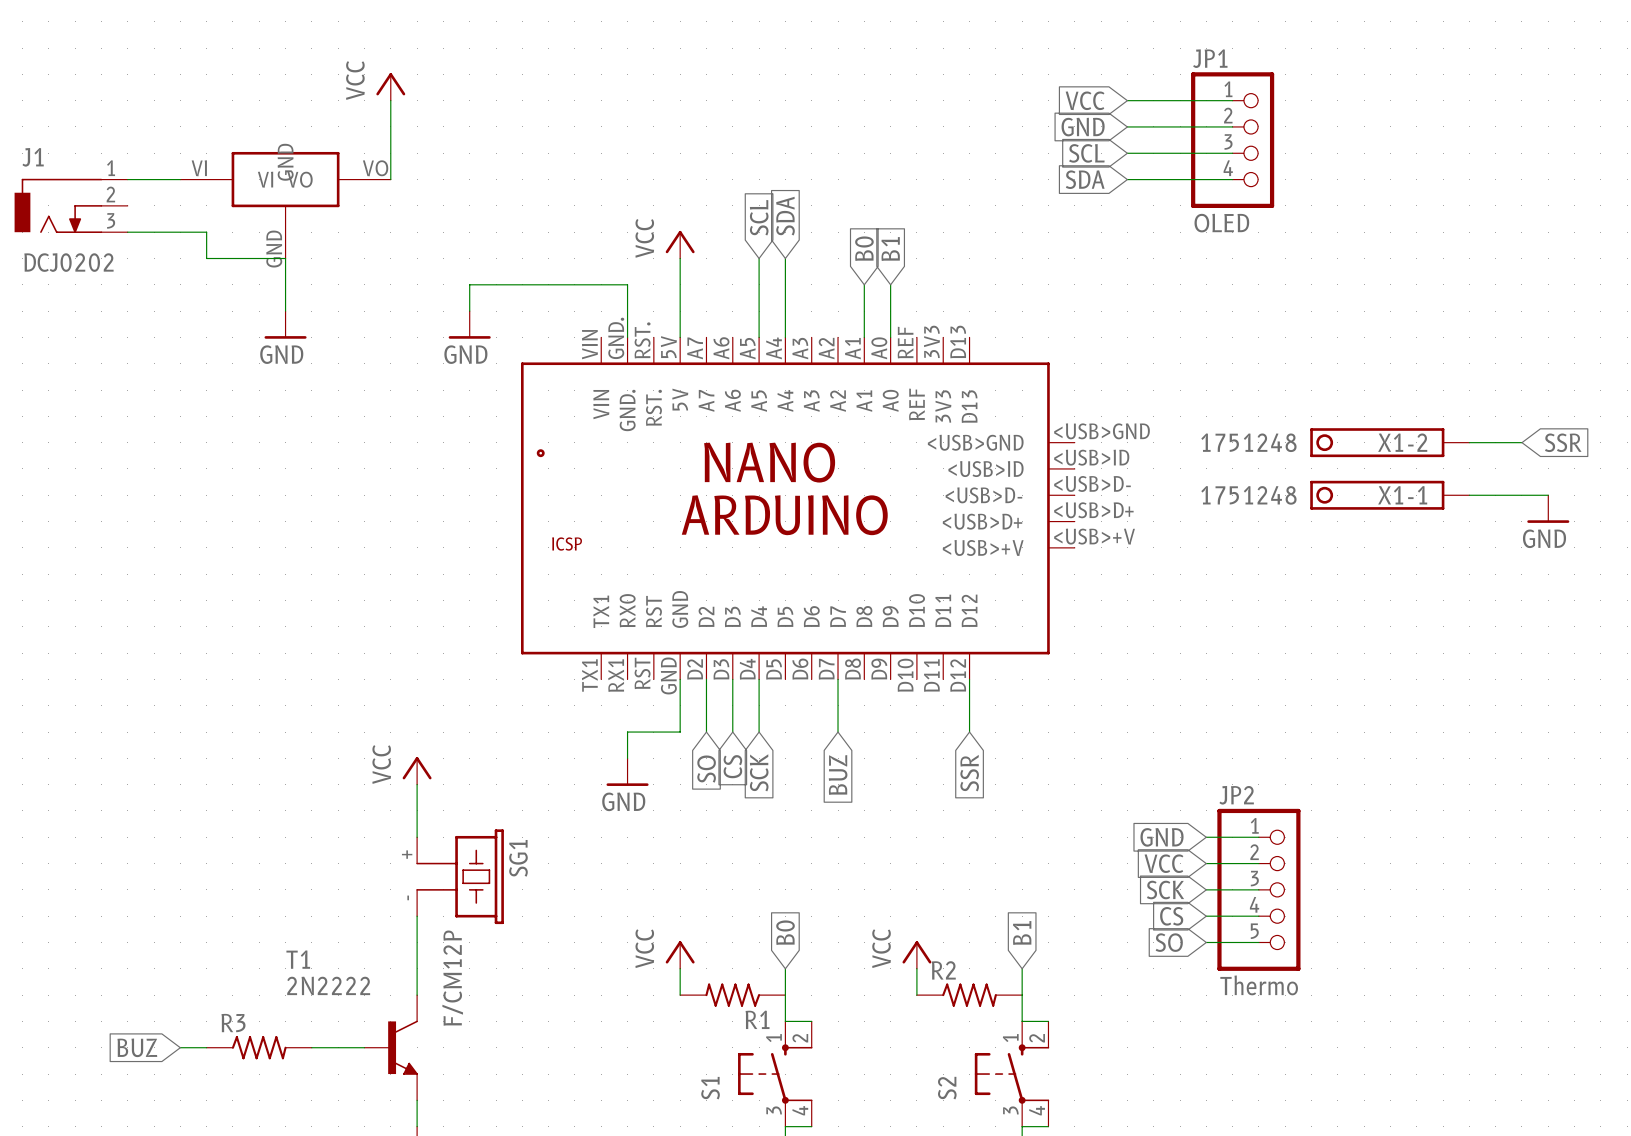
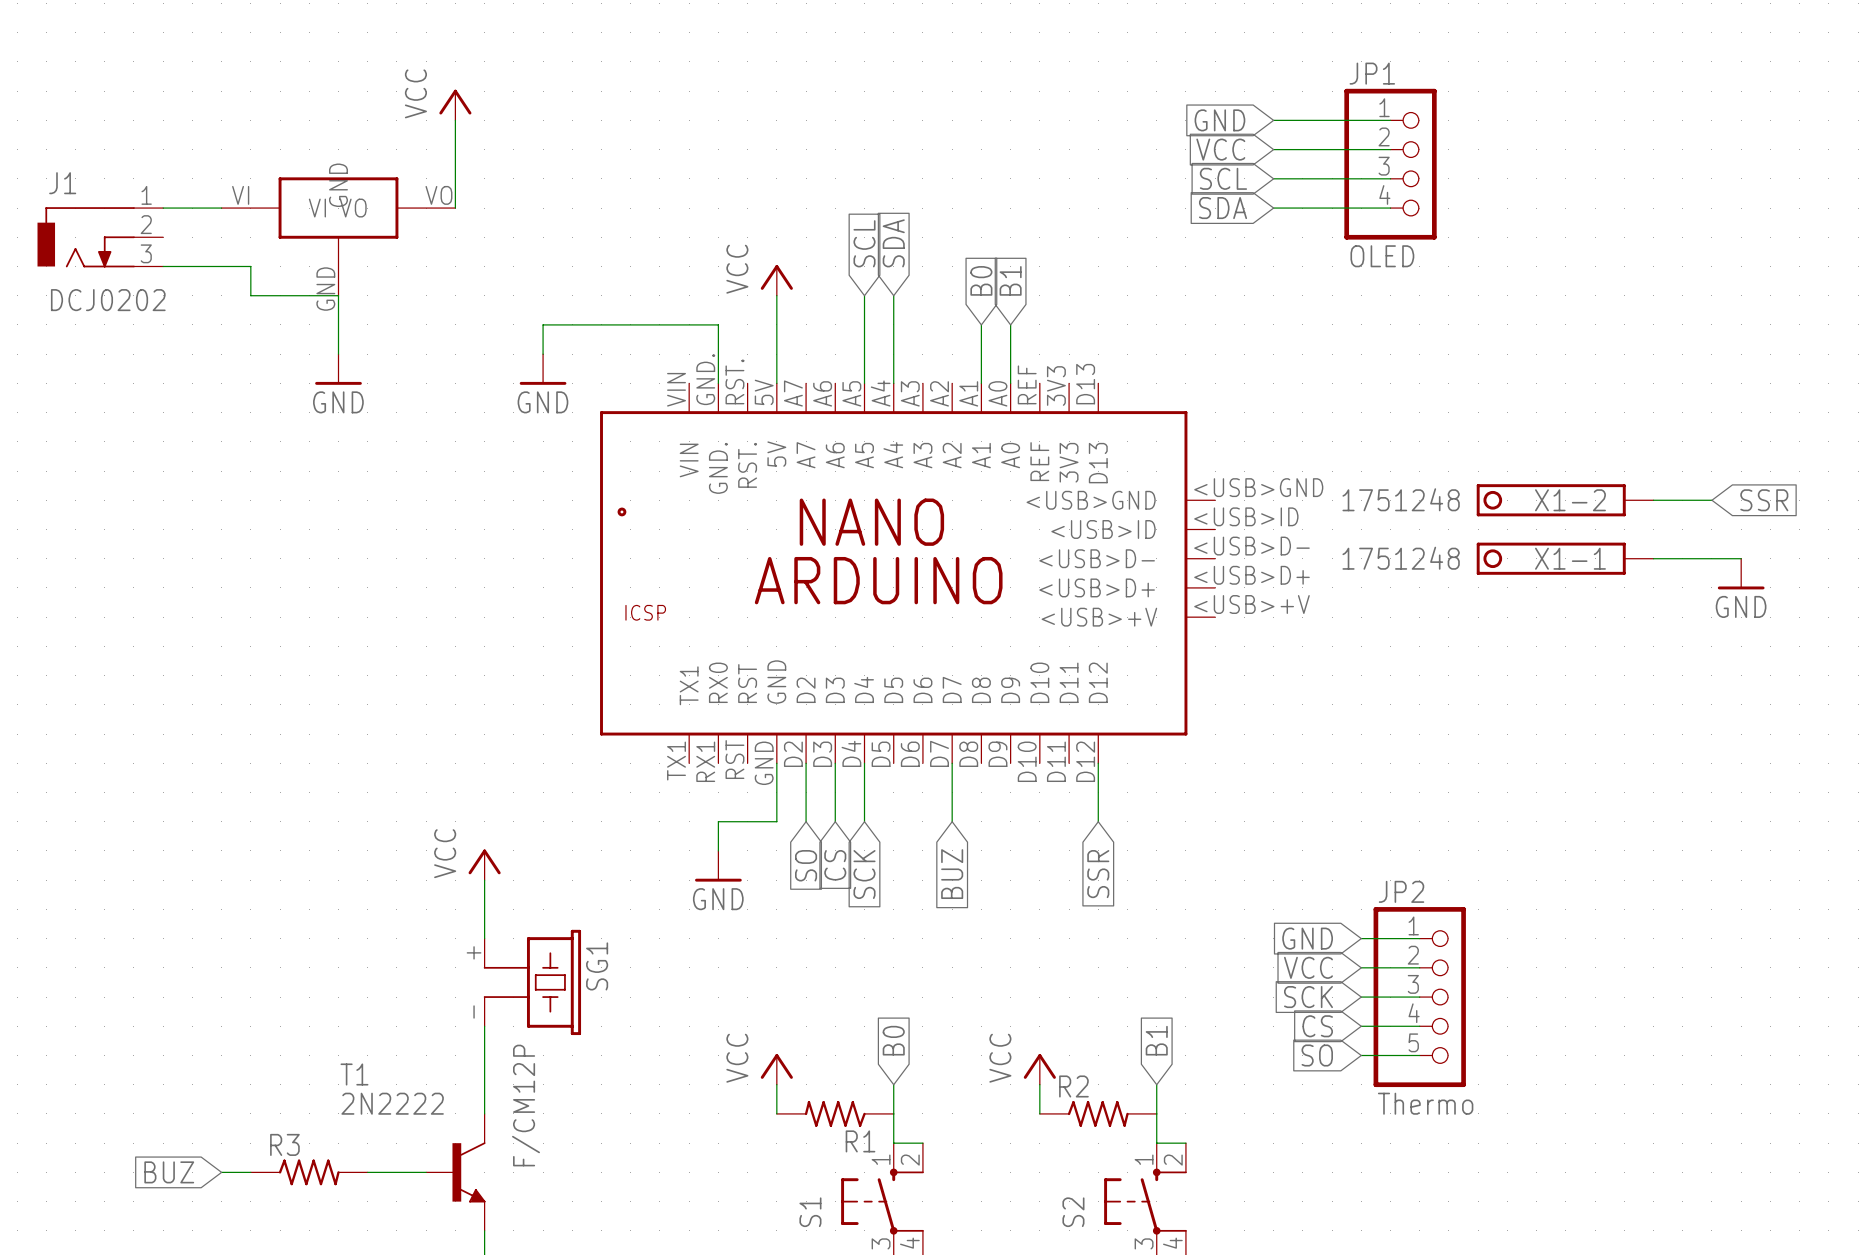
global label: VCC (1085, 100) -> GND (1219, 120)
global label: GND (1083, 127) -> VCC (1220, 149)

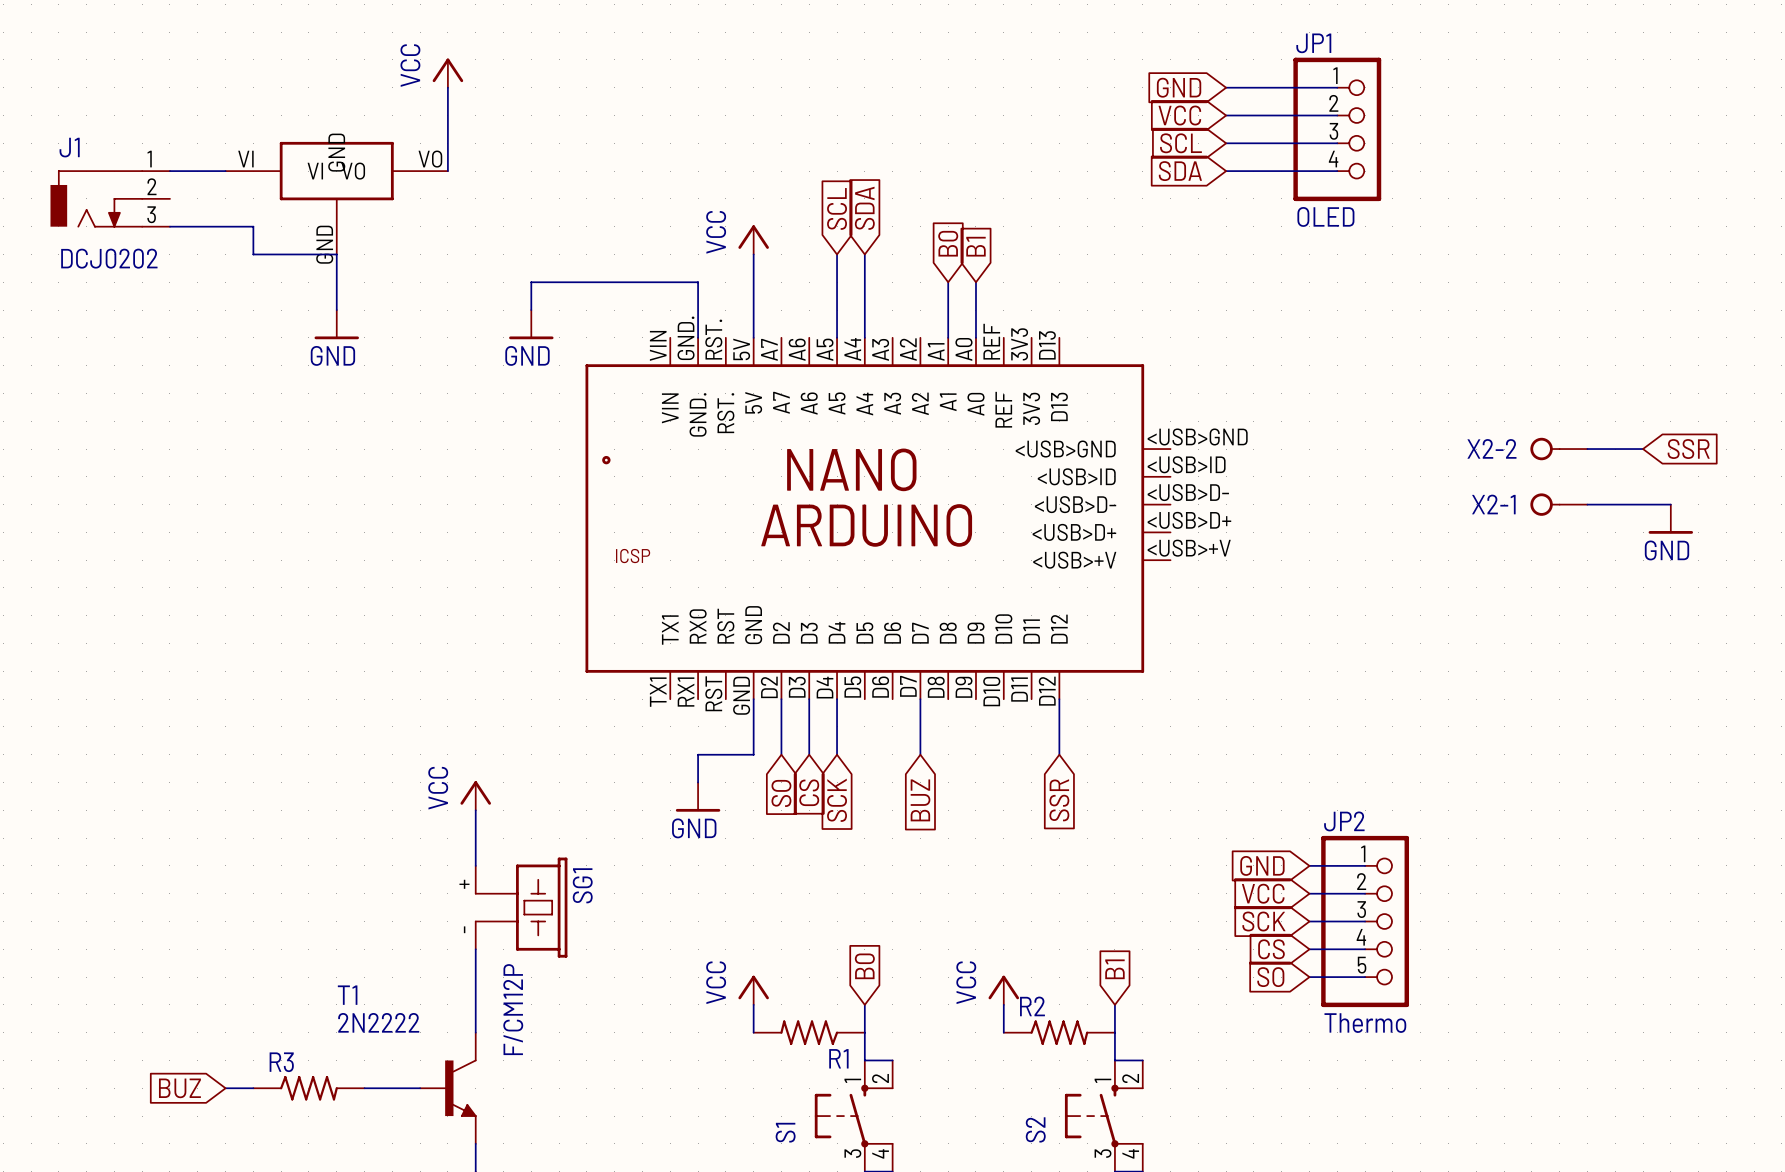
X1-2: 1751248 (1565, 500) -> none
X2-2: none -> (1558, 449)
X1-1: 1751248 (1565, 558) -> none
X2-1: none -> (1558, 504)

